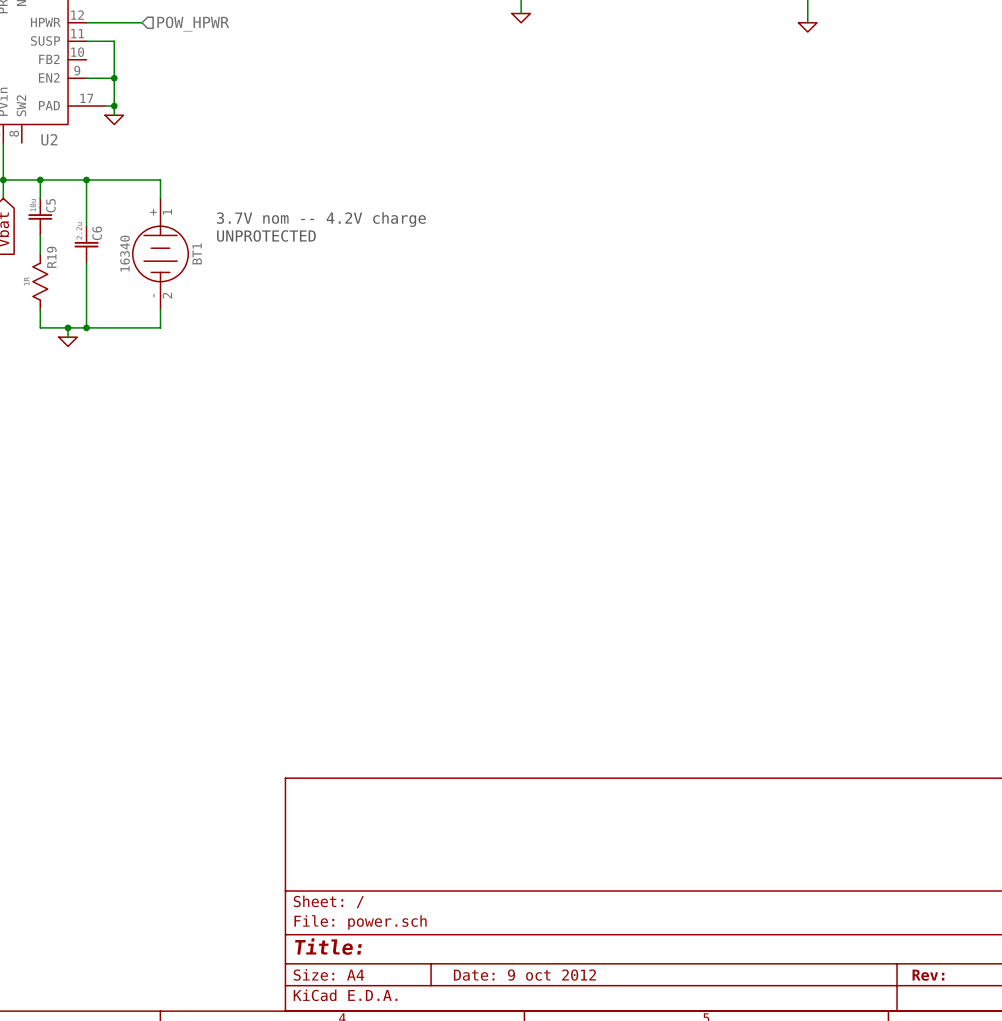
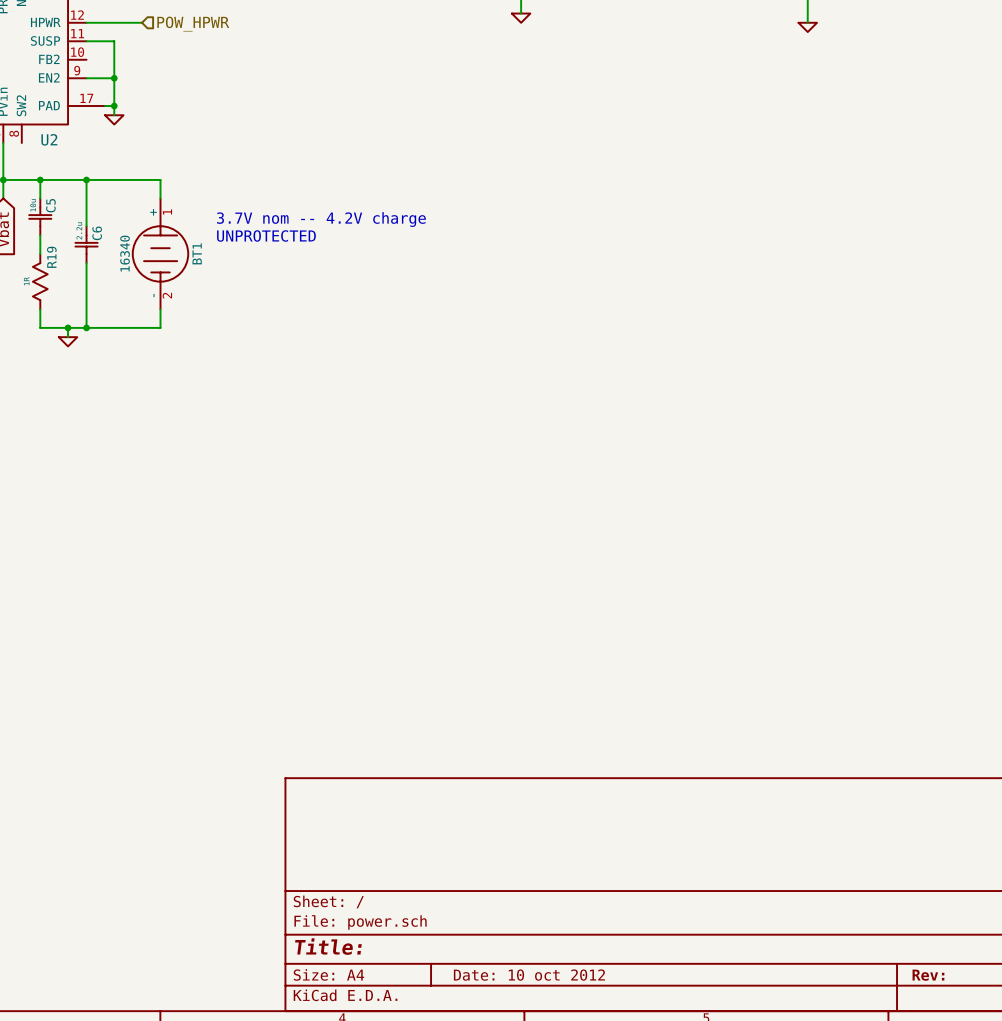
title block: Date: 9 oct 2012 (524, 975) -> Date: 10 oct 2012 (529, 975)

